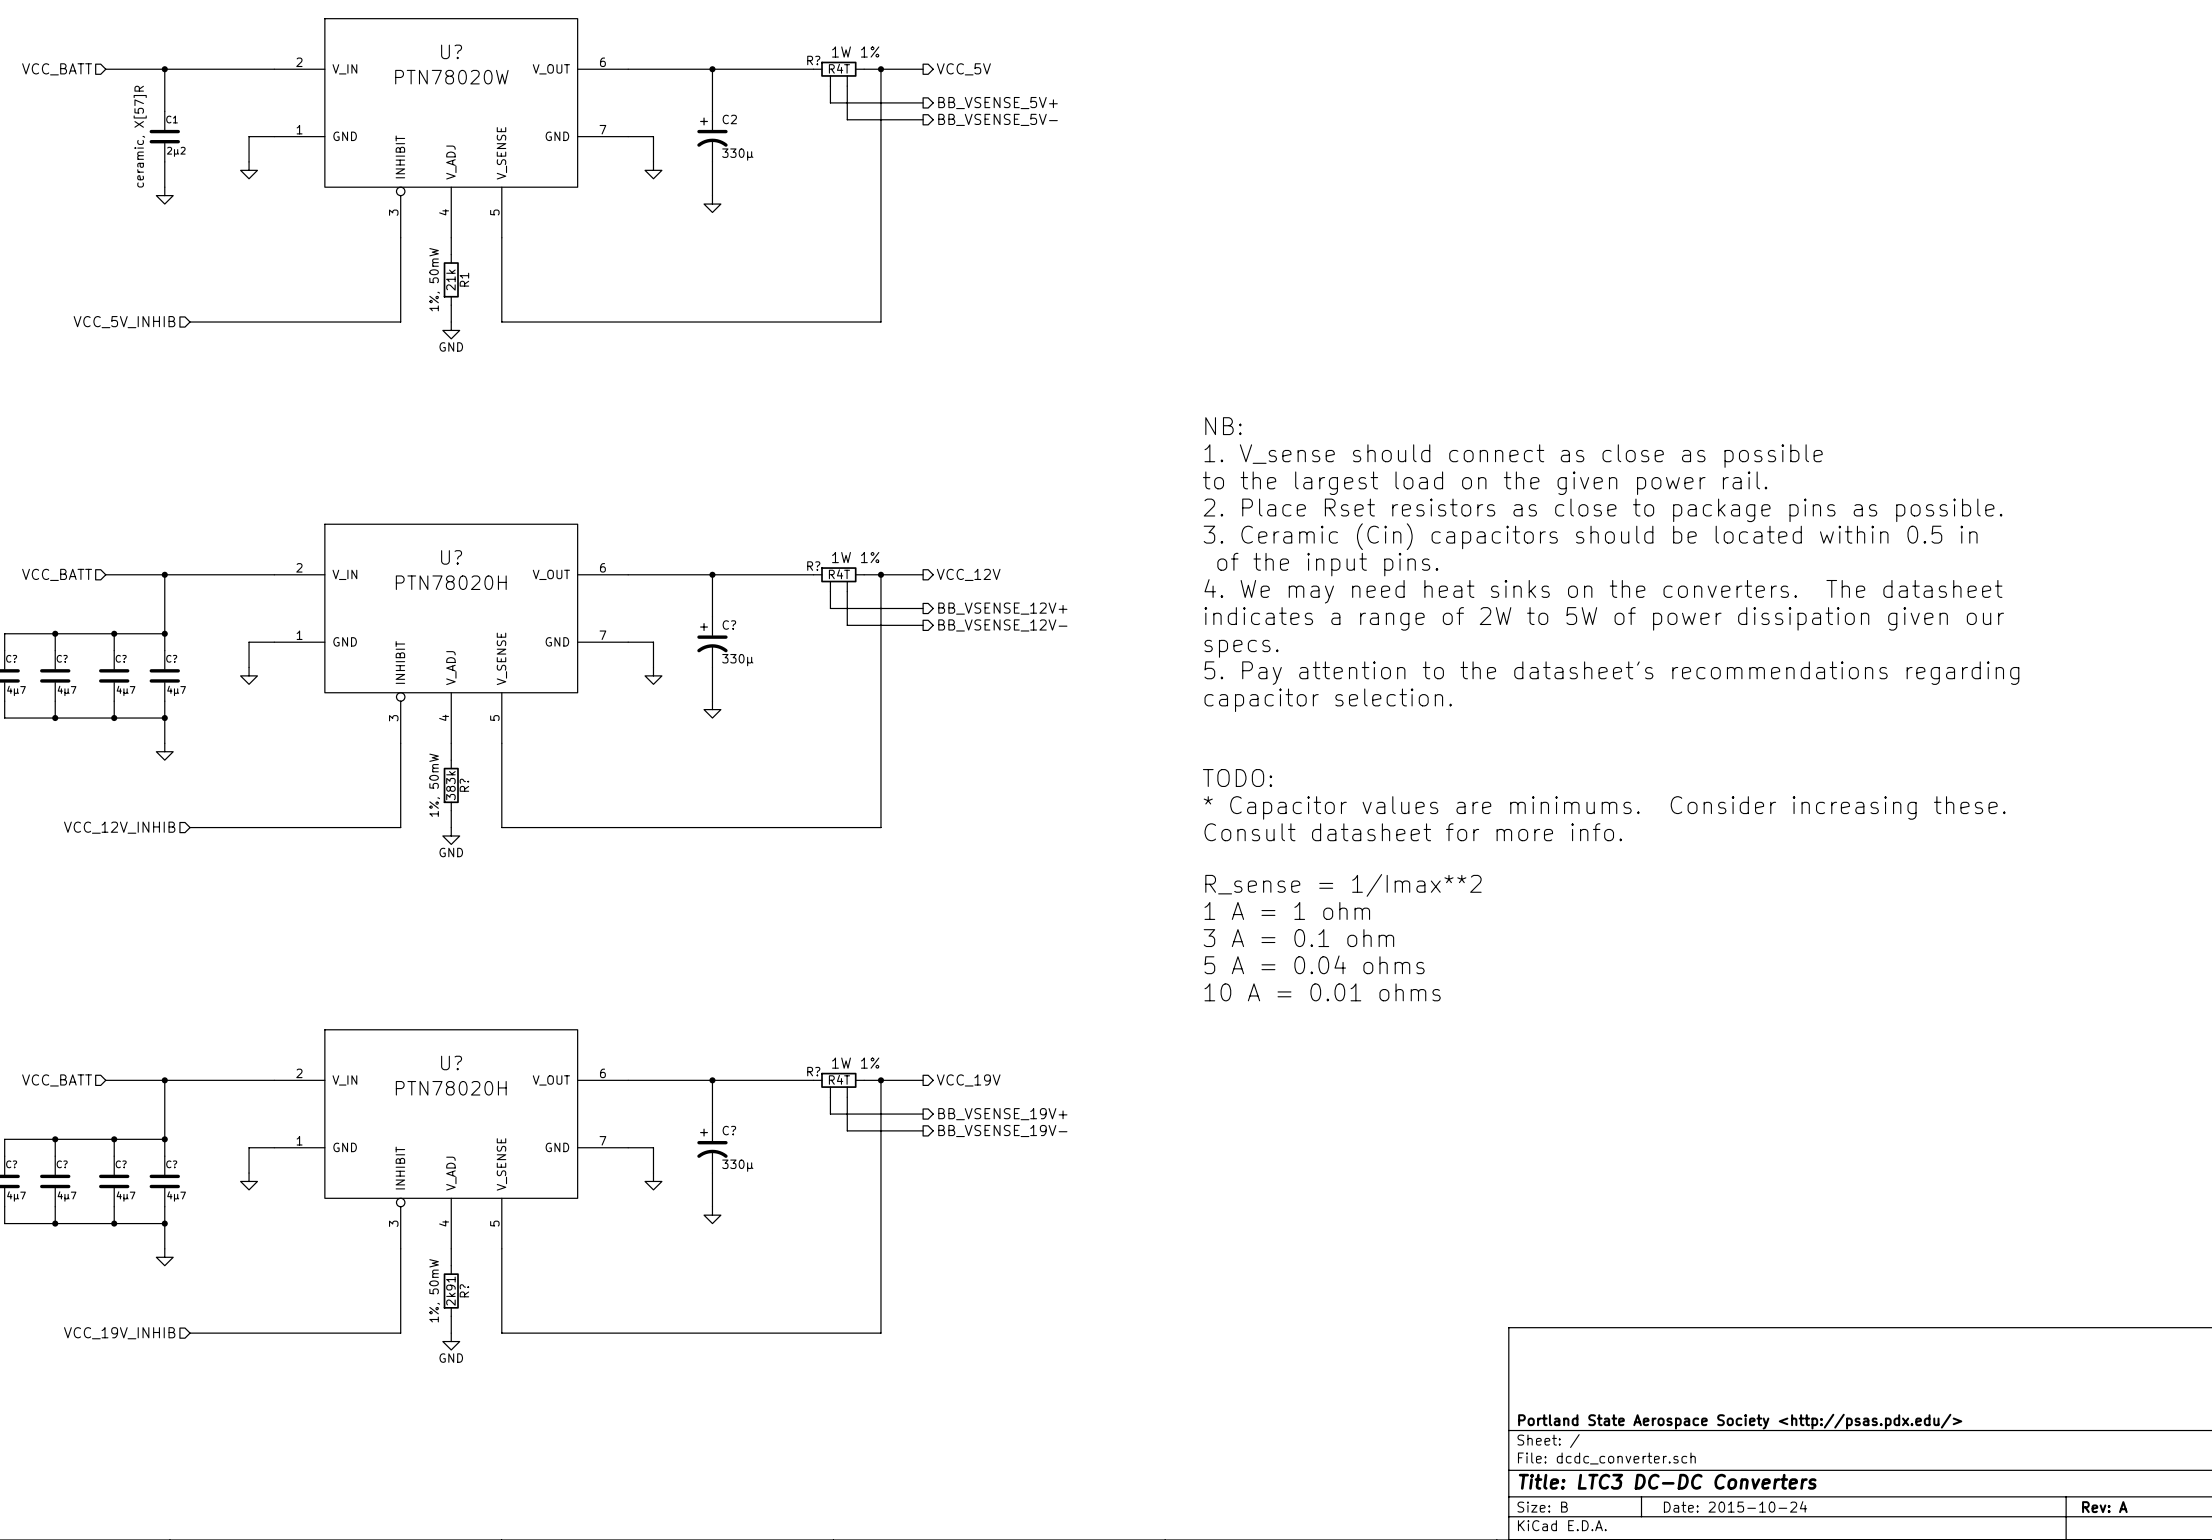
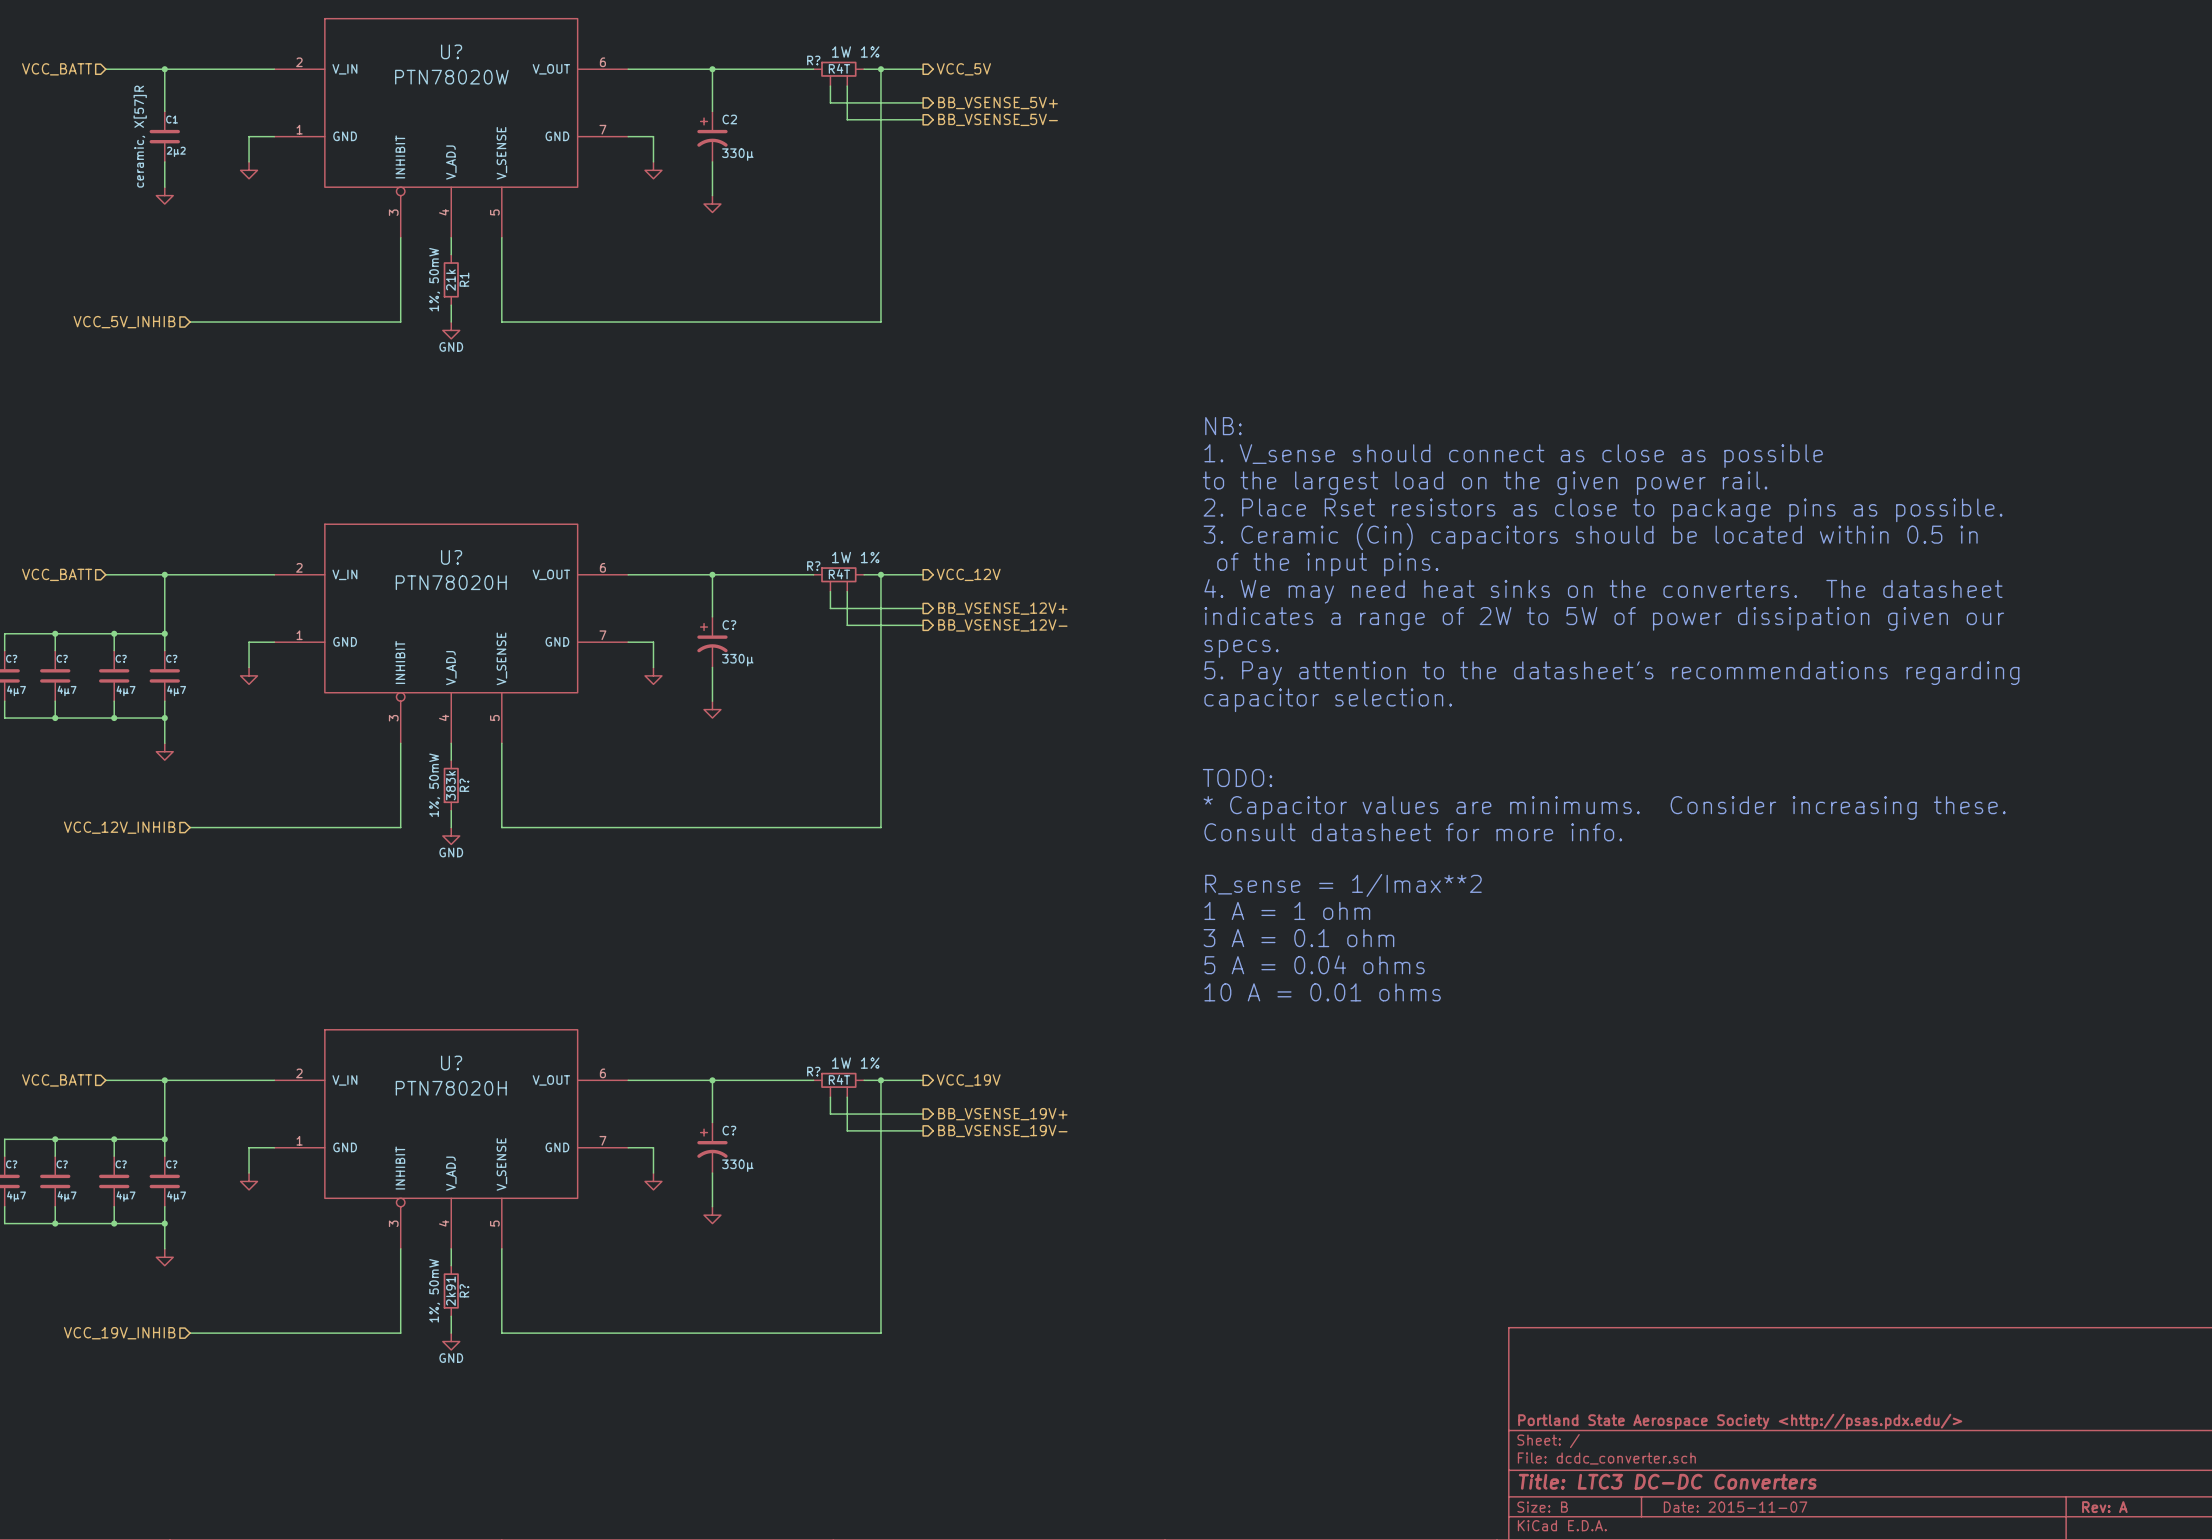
title block: Date: 2015-10-24 (1735, 1506) -> Date: 2015-11-07 (1735, 1507)

